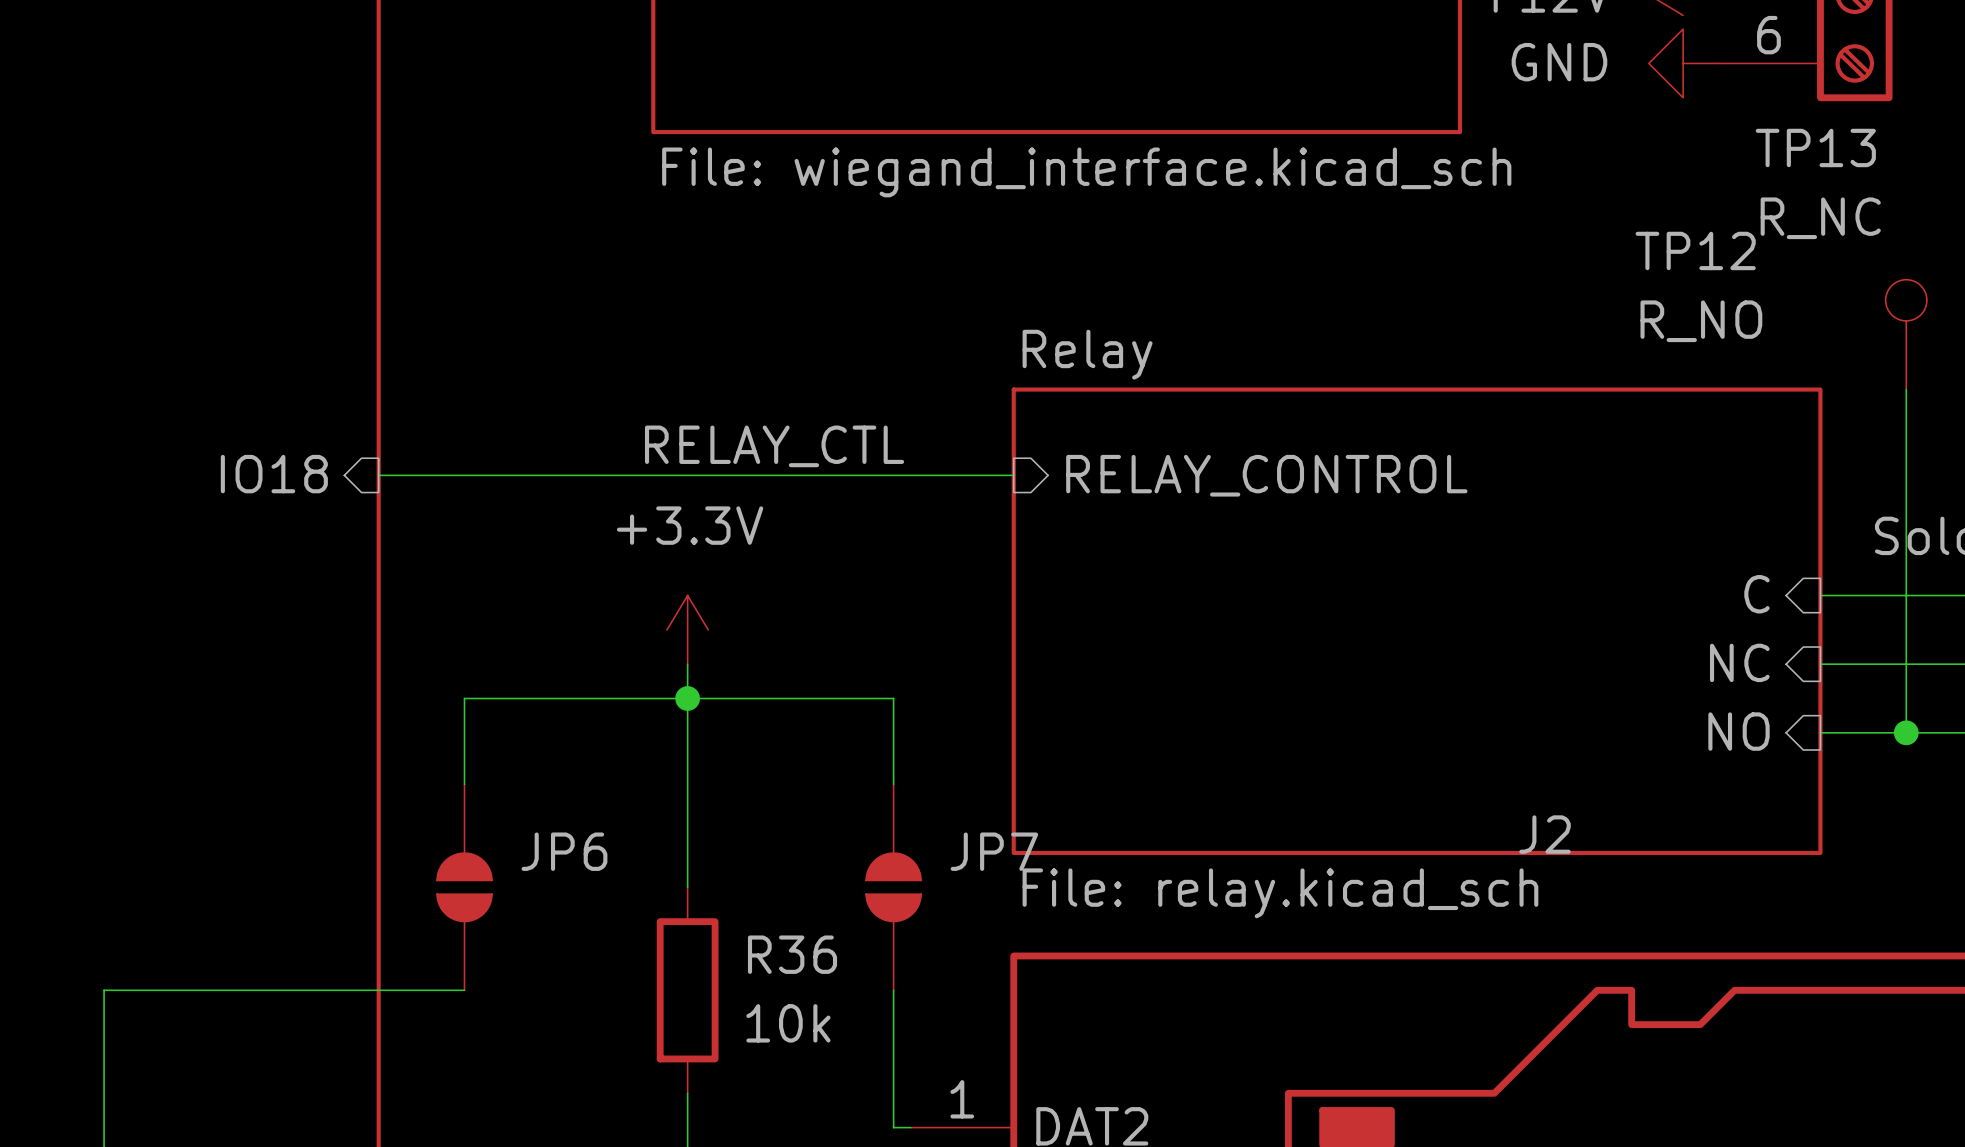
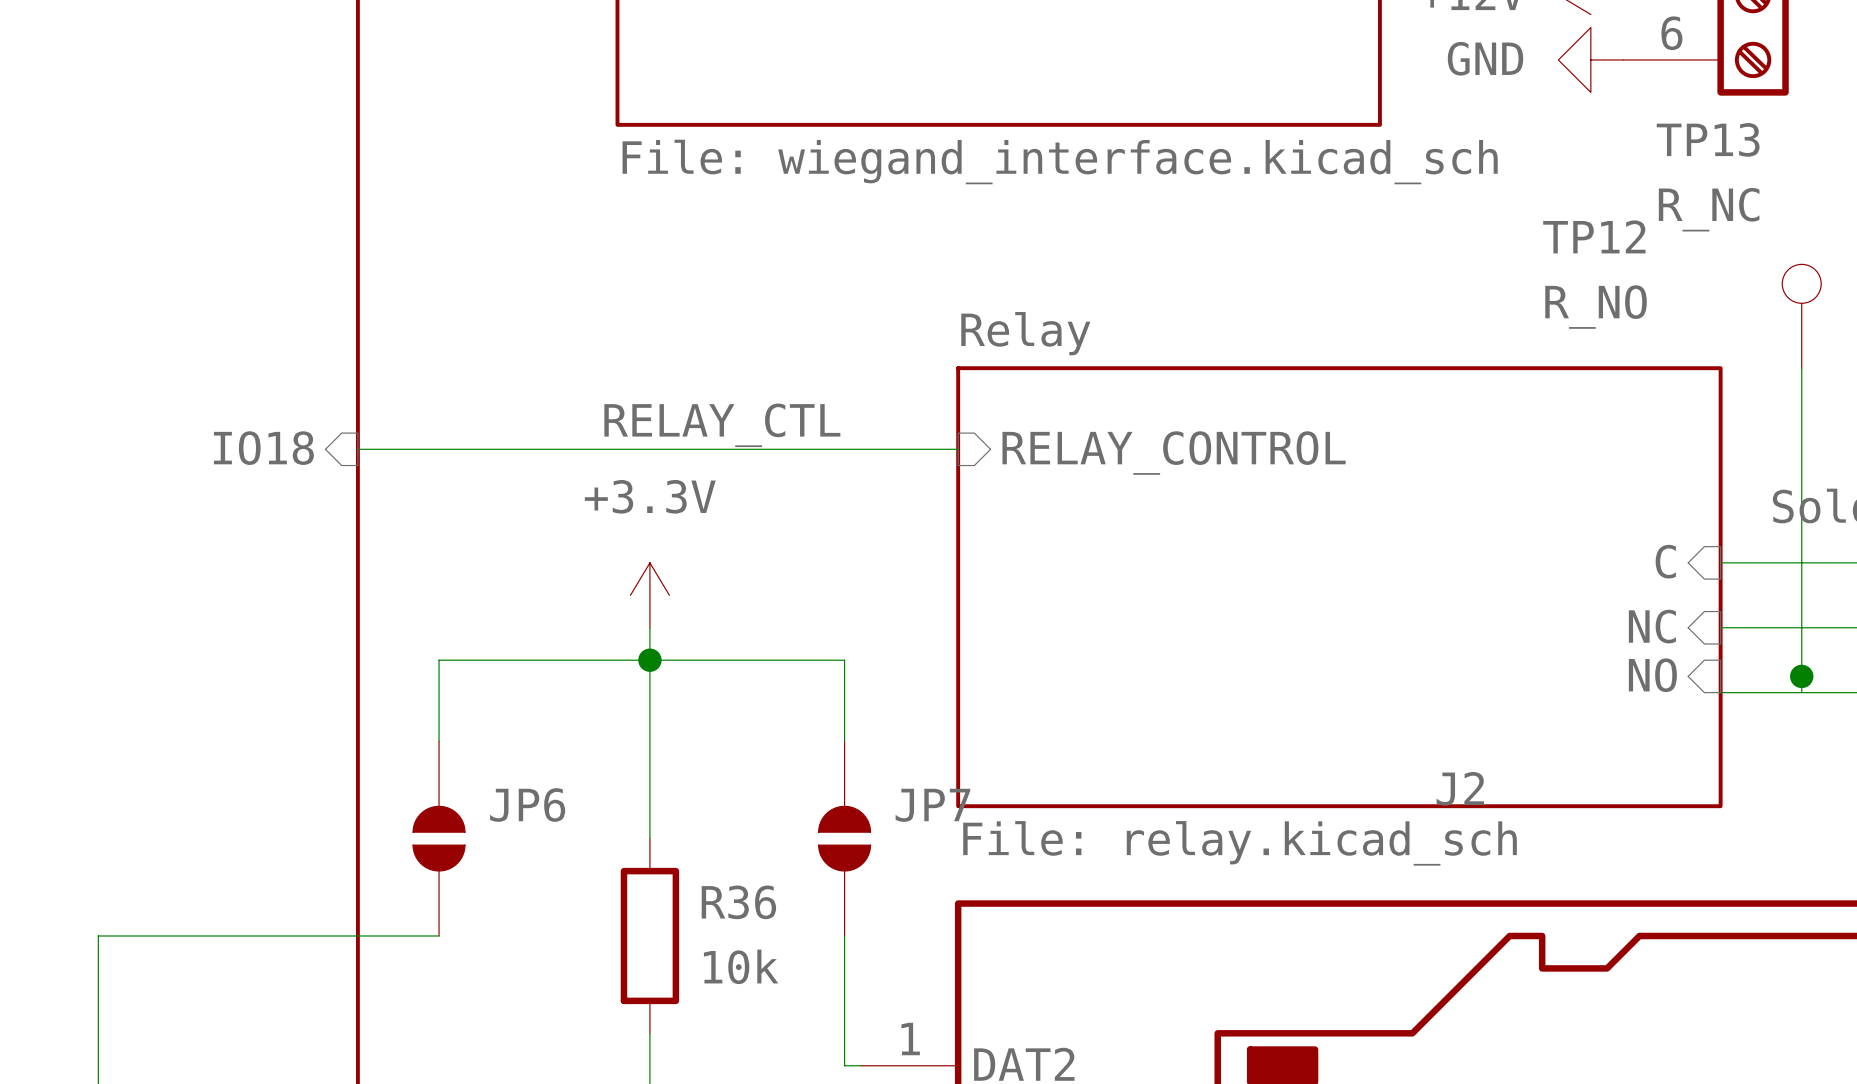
sheet pin position: NO (1739, 731) -> NO (1652, 675)
junction position: (1906, 732) -> (1801, 676)

